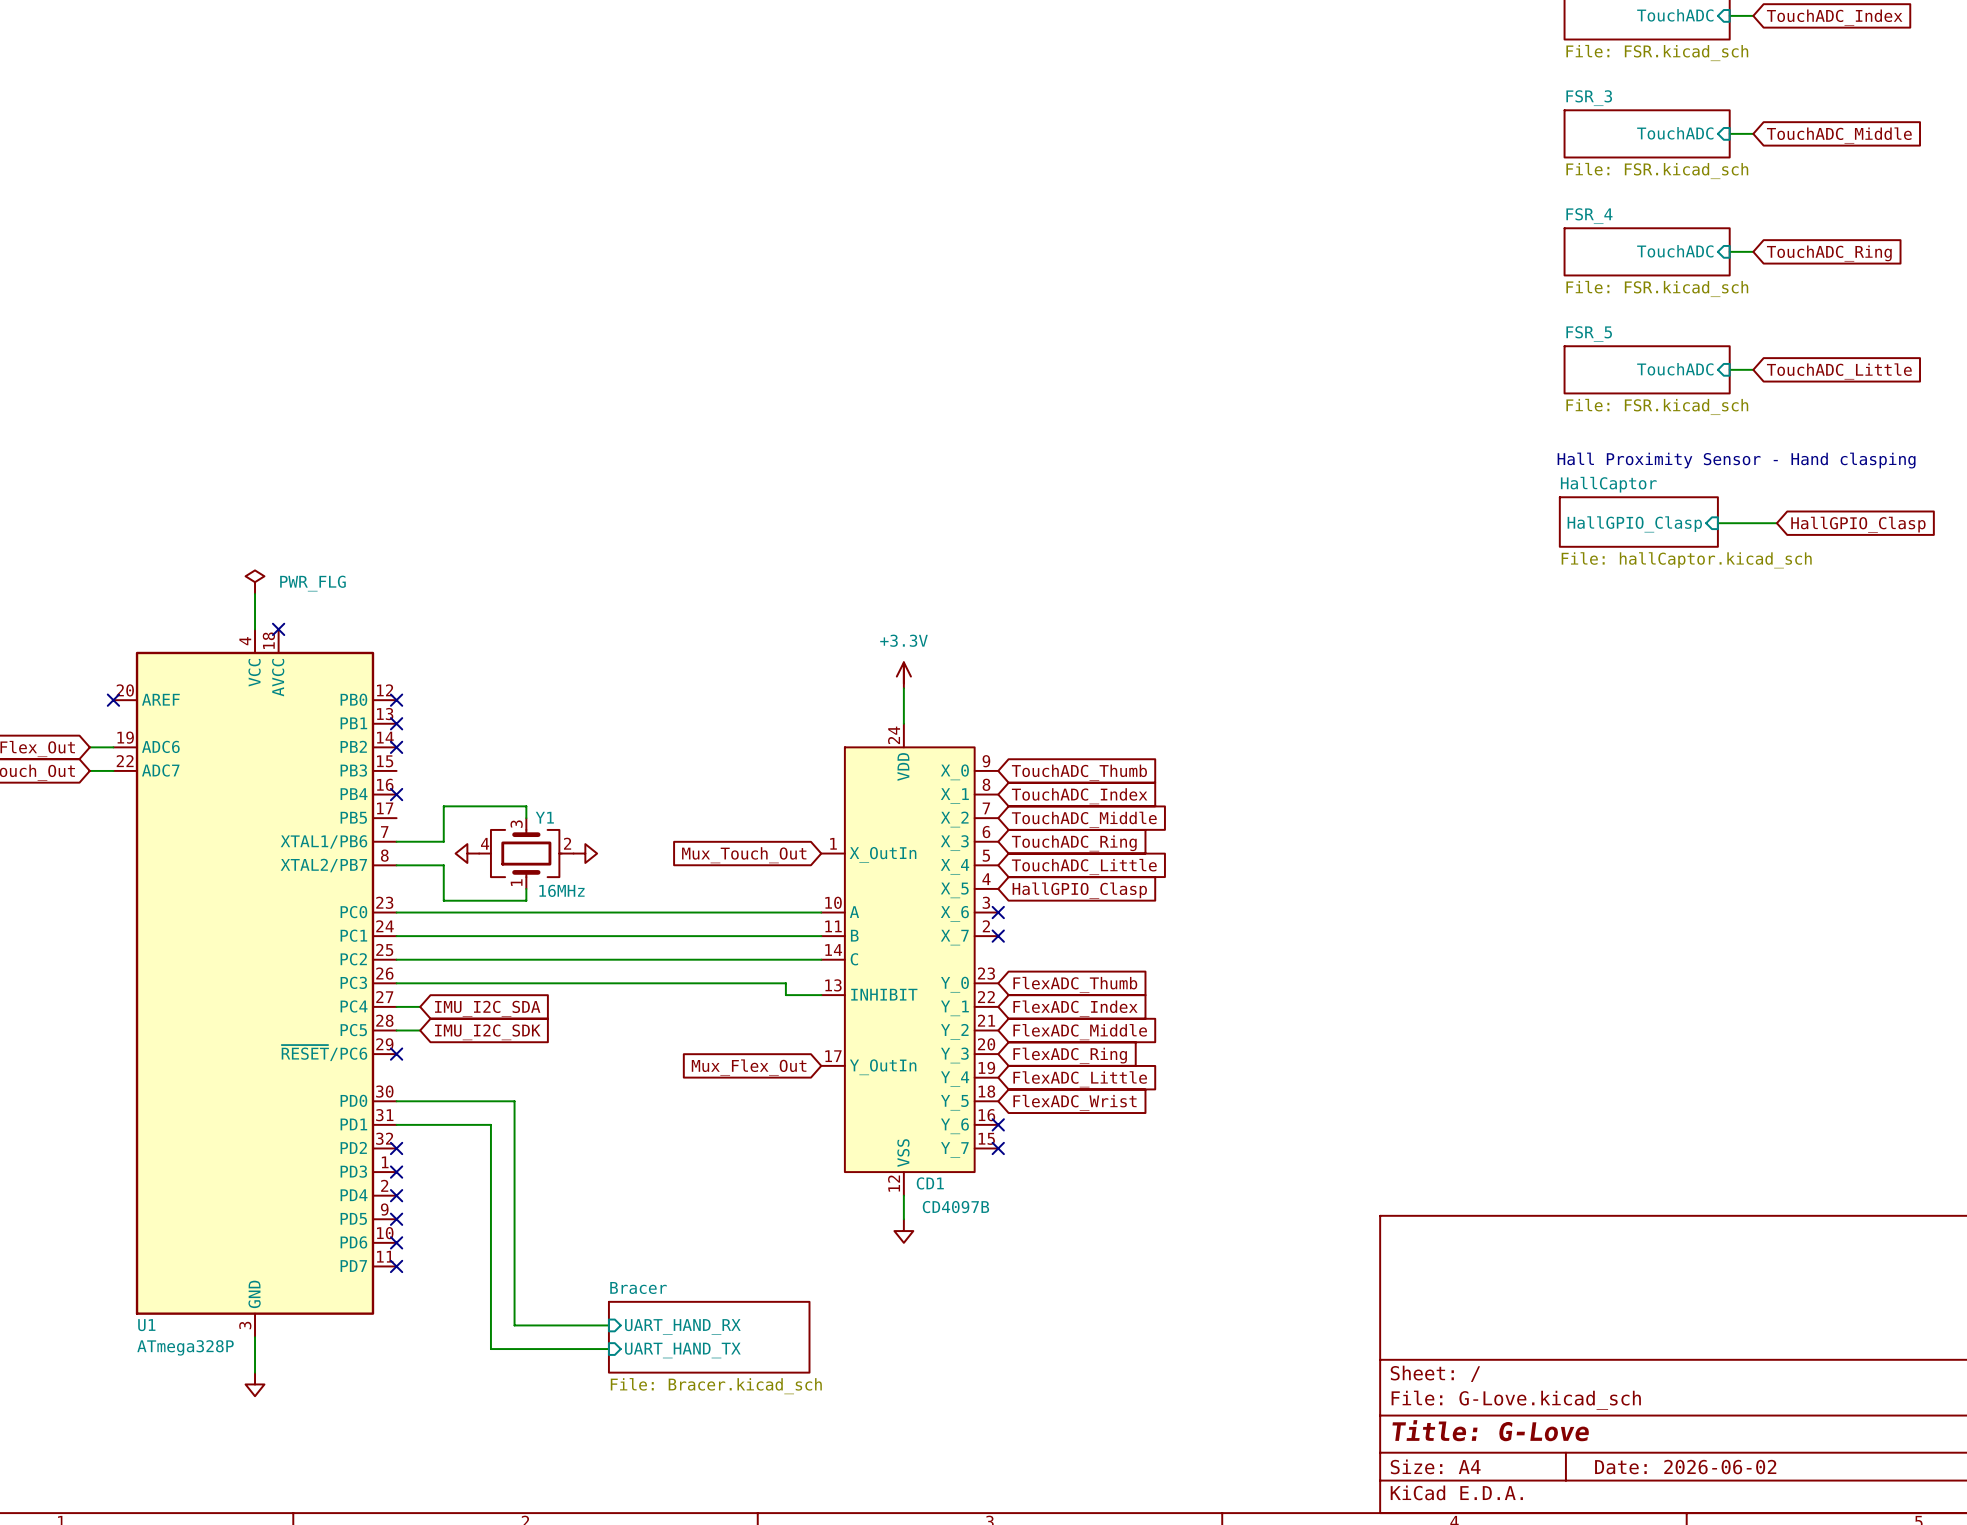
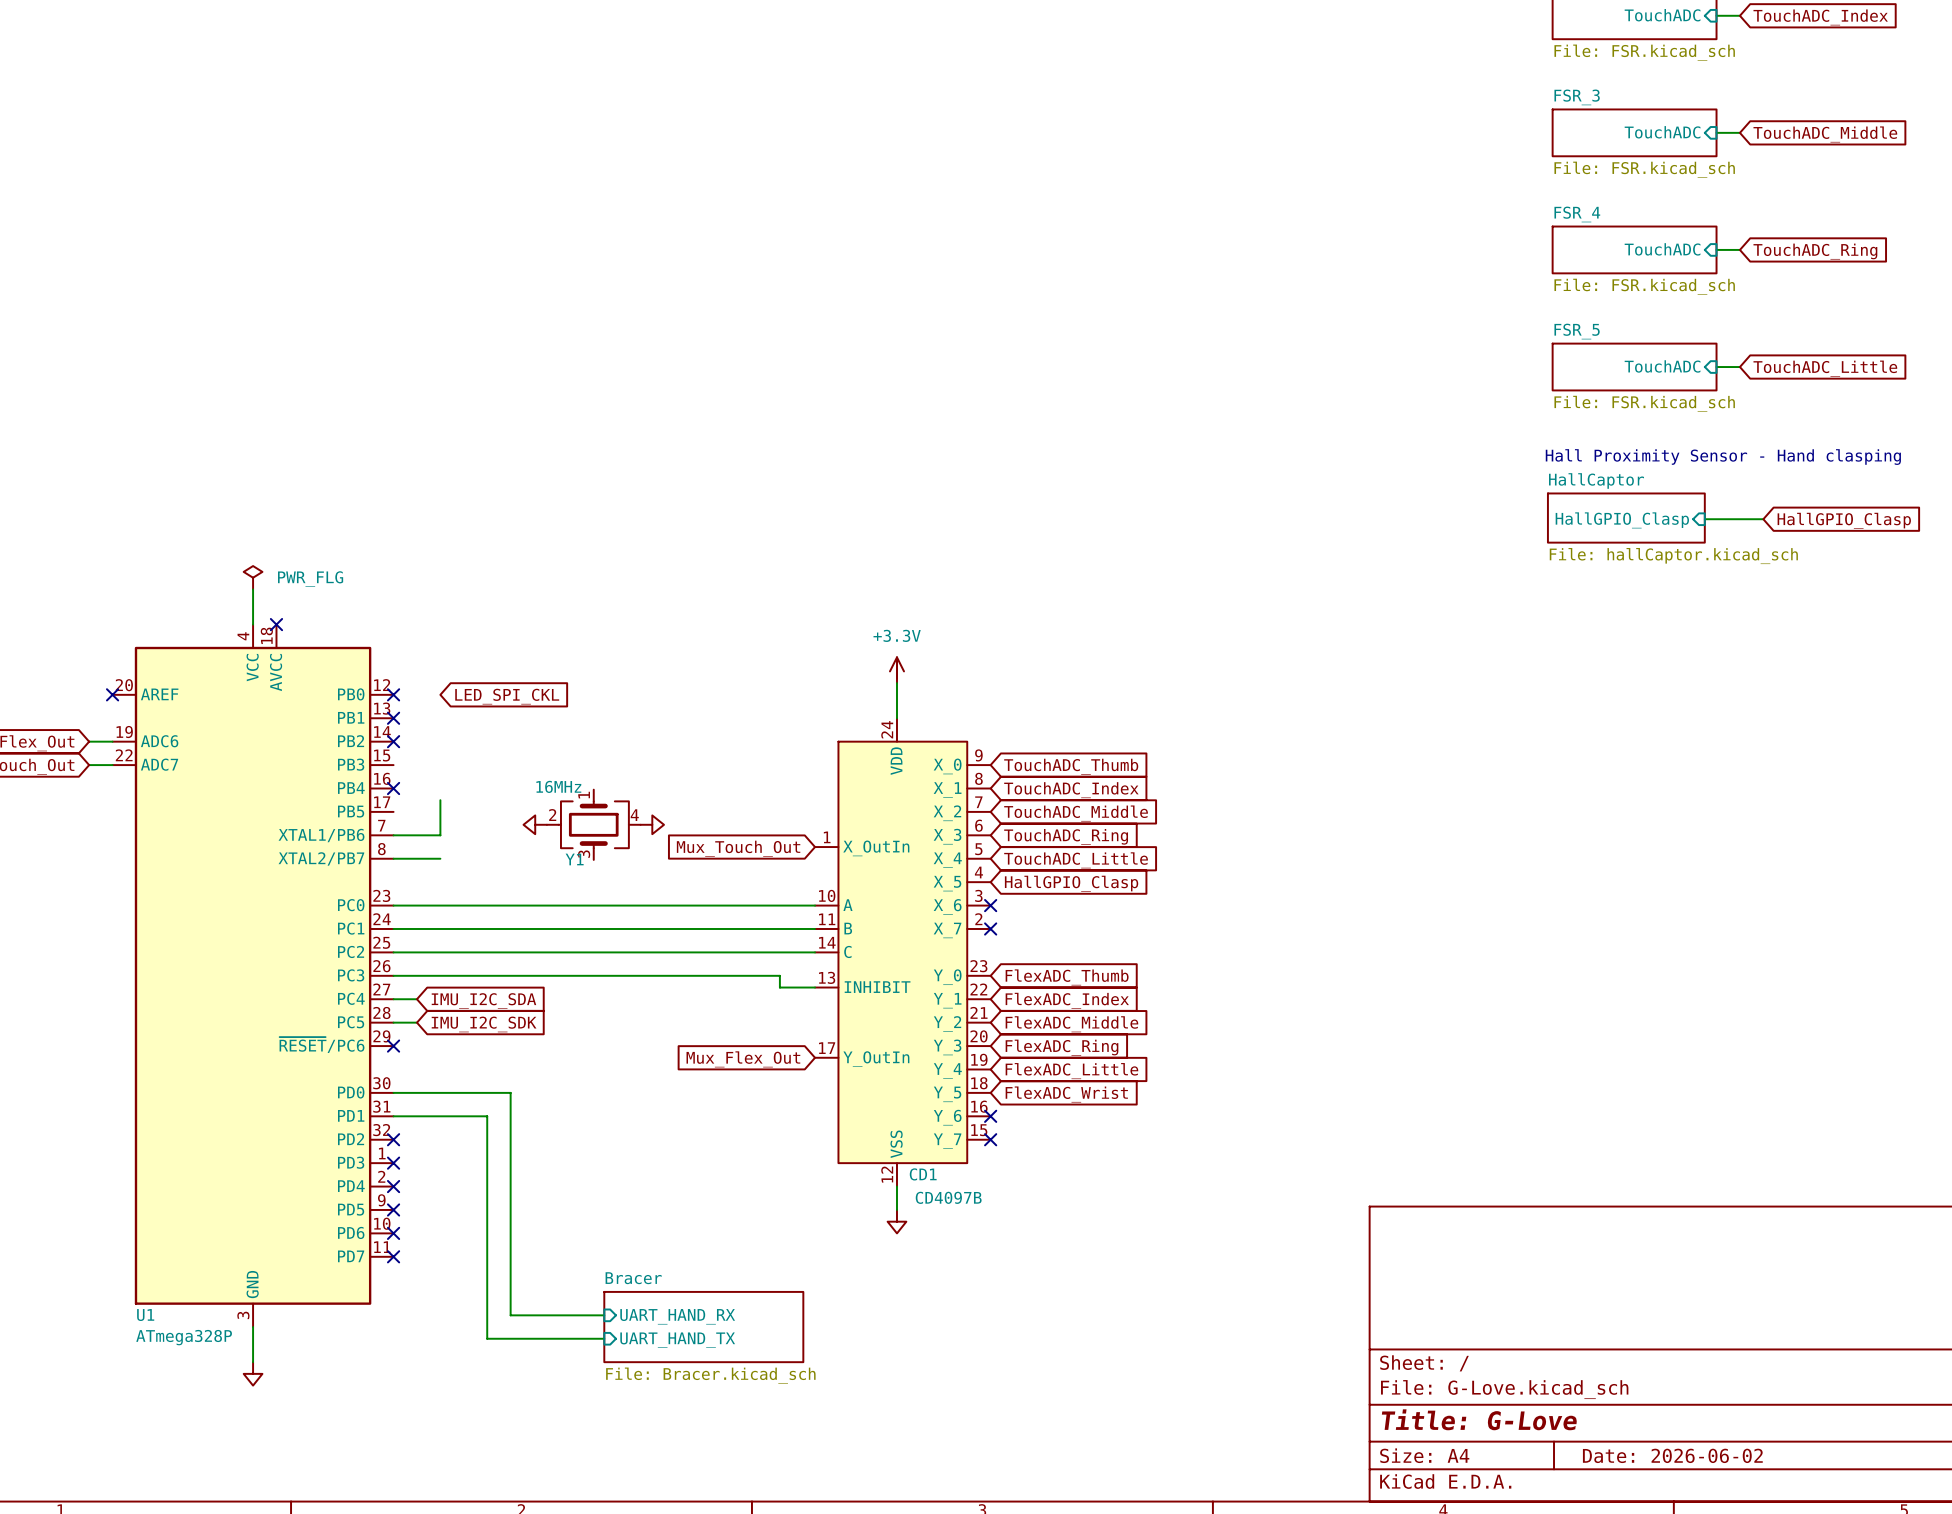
global label: none -> LED_SPI_CKL (507, 696)
wire: (443, 806) (526, 806) (526, 818) -> none
power symbol: none -> (535, 824)
power symbol: none -> (652, 824)
power symbol: (467, 853) -> none
Y1 rotation: 0° (526, 853) -> 180° (593, 824)
Y1 position: (526, 853) -> (593, 824)
power symbol: (585, 853) -> none
wire: (443, 865) (443, 900) (526, 900) (526, 888) -> none

